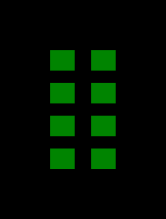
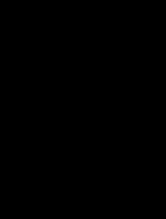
part: (82, 60) -> none
part: (82, 93) -> none
part: (82, 125) -> none
part: (82, 158) -> none

